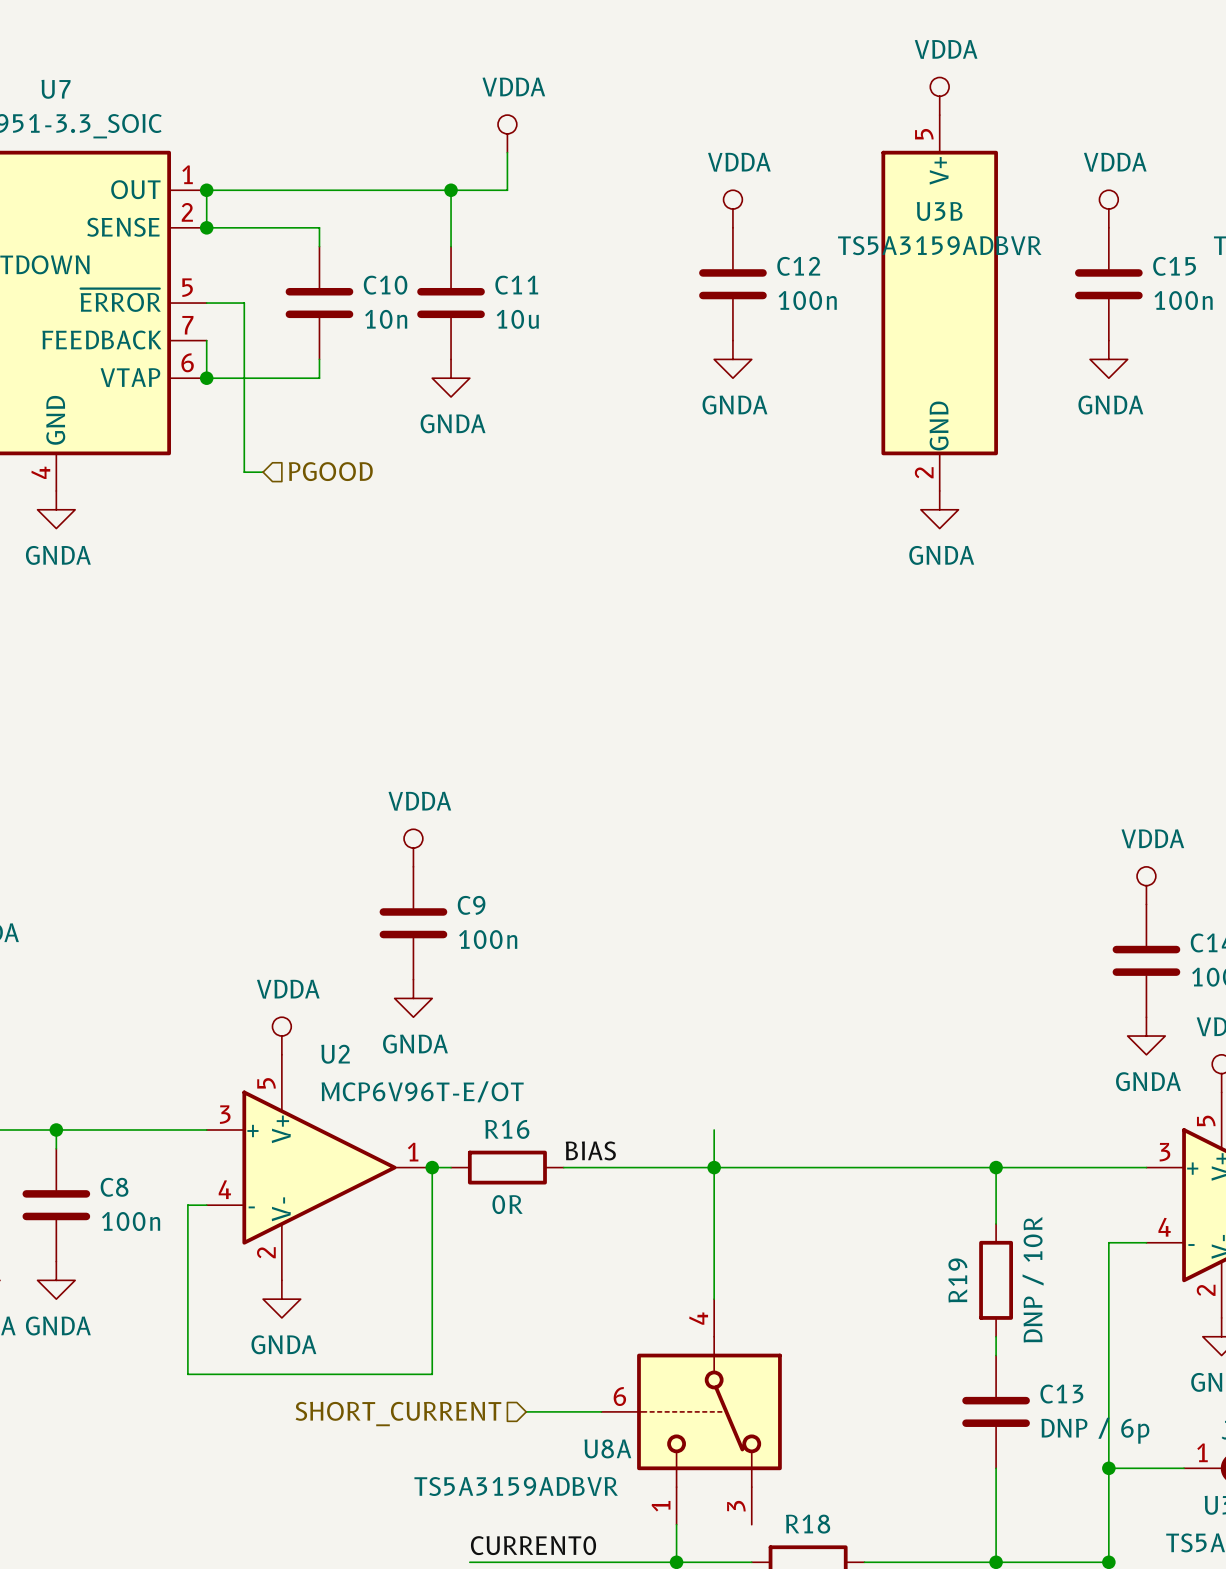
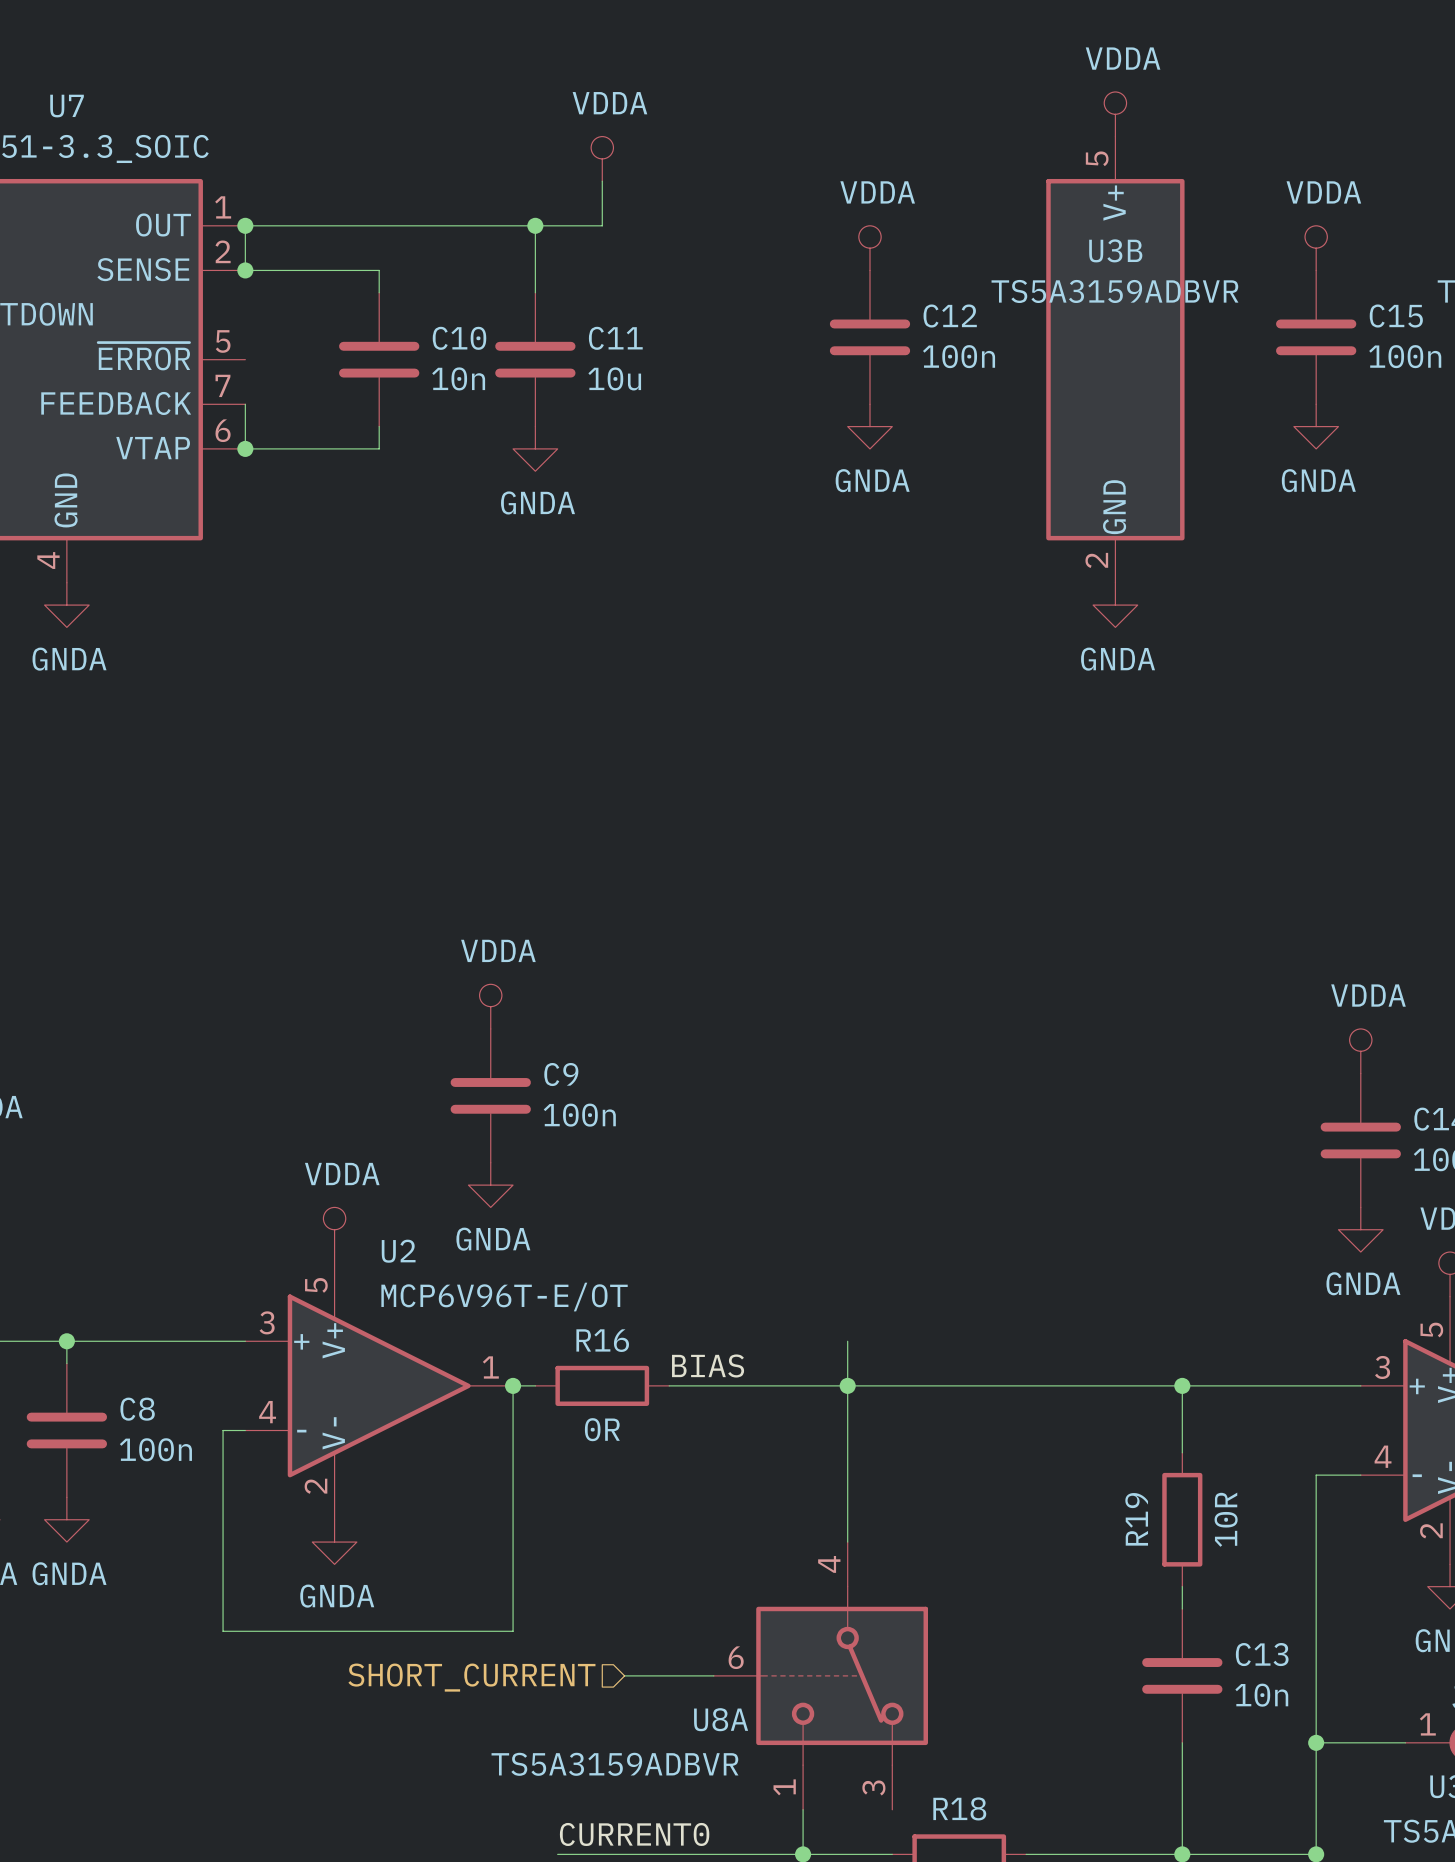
wire: (206, 303) (244, 303) (244, 472) (263, 472) -> none
hierarchical label: PGOOD (330, 471) -> none
R19 value: DNP / 10R (1033, 1279) -> 10R (1226, 1519)
C13 value: DNP / 6p (1095, 1430) -> 10n (1261, 1695)

